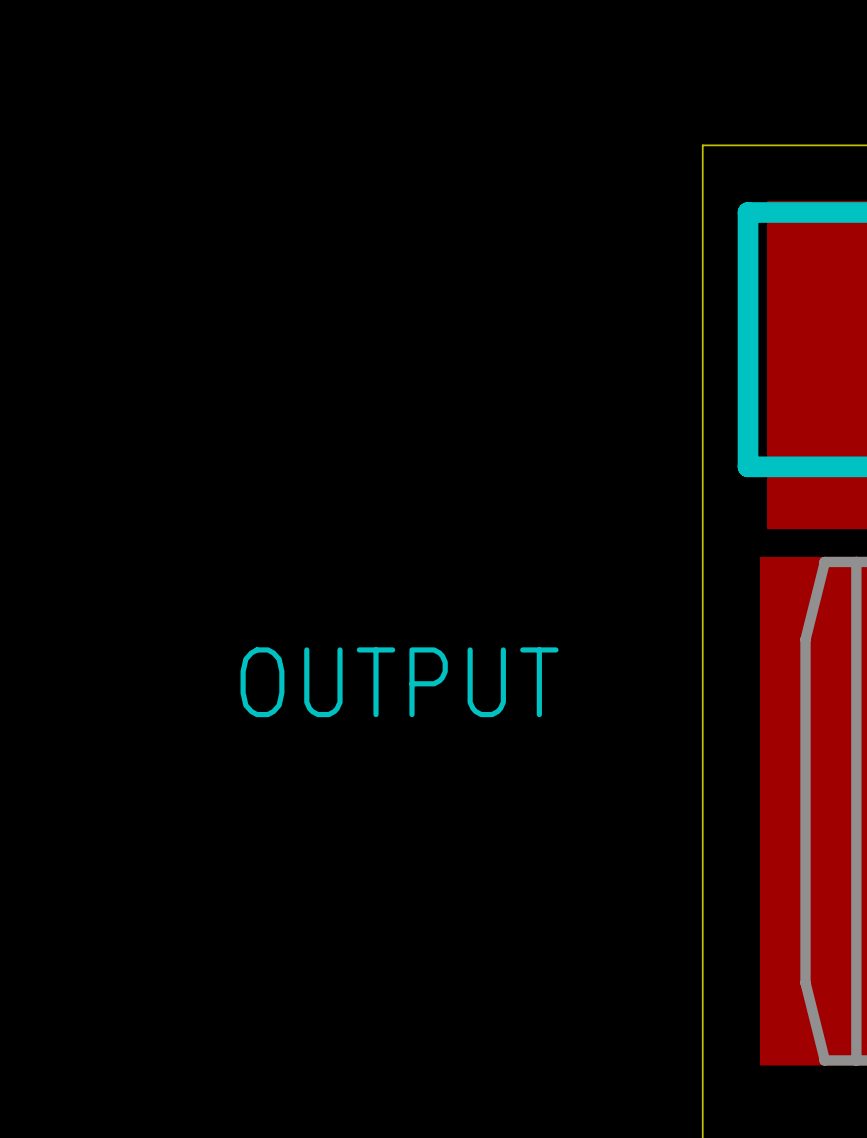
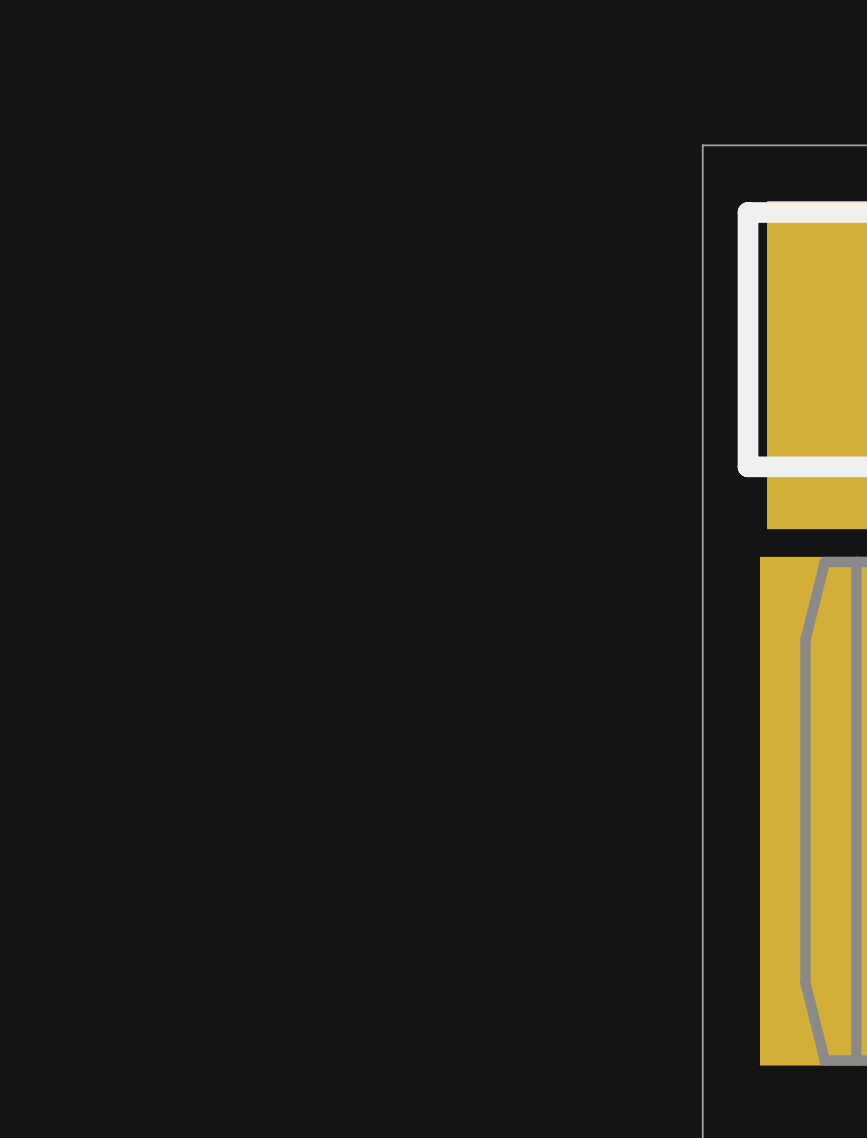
OUTPUT name: OUTPUT (399, 682) -> none

